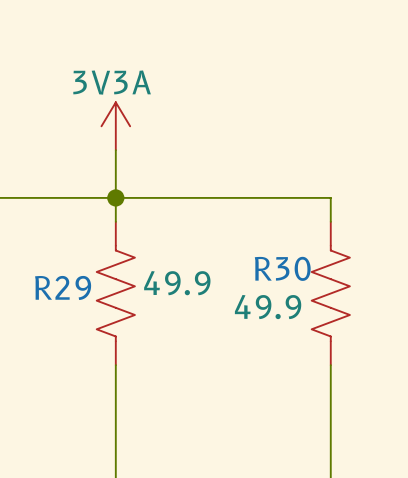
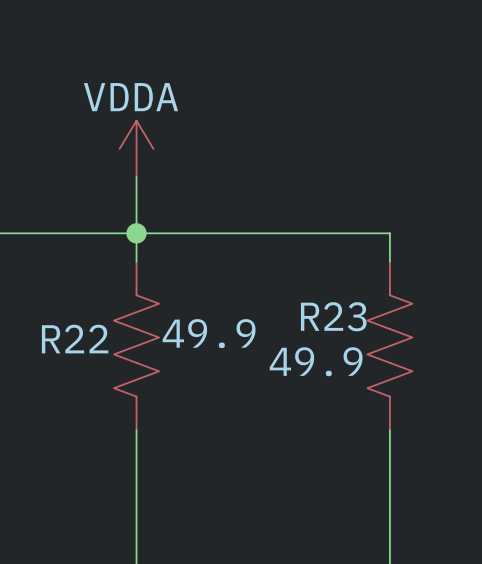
power symbol: 3V3A (115, 126) -> VDDA (136, 148)
R30 name: R30 (282, 268) -> R23 (333, 316)
R29 name: R29 (63, 287) -> R22 (75, 339)

